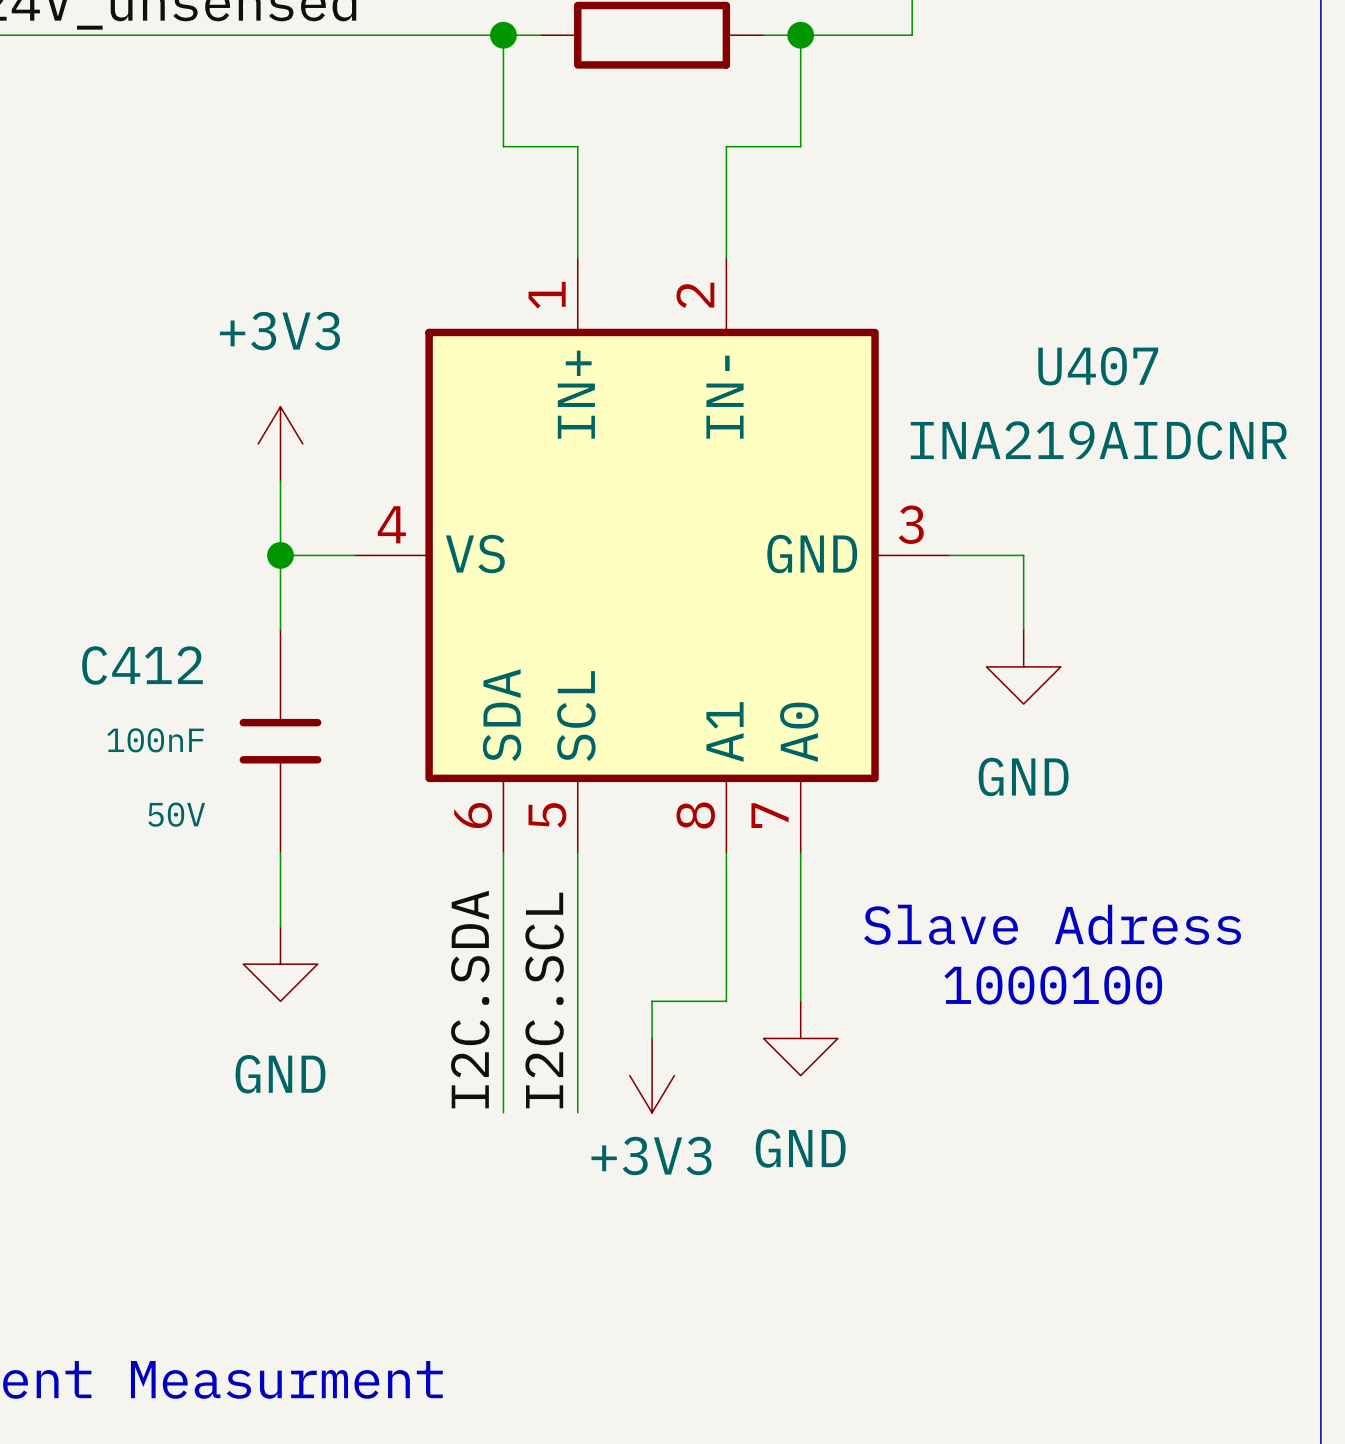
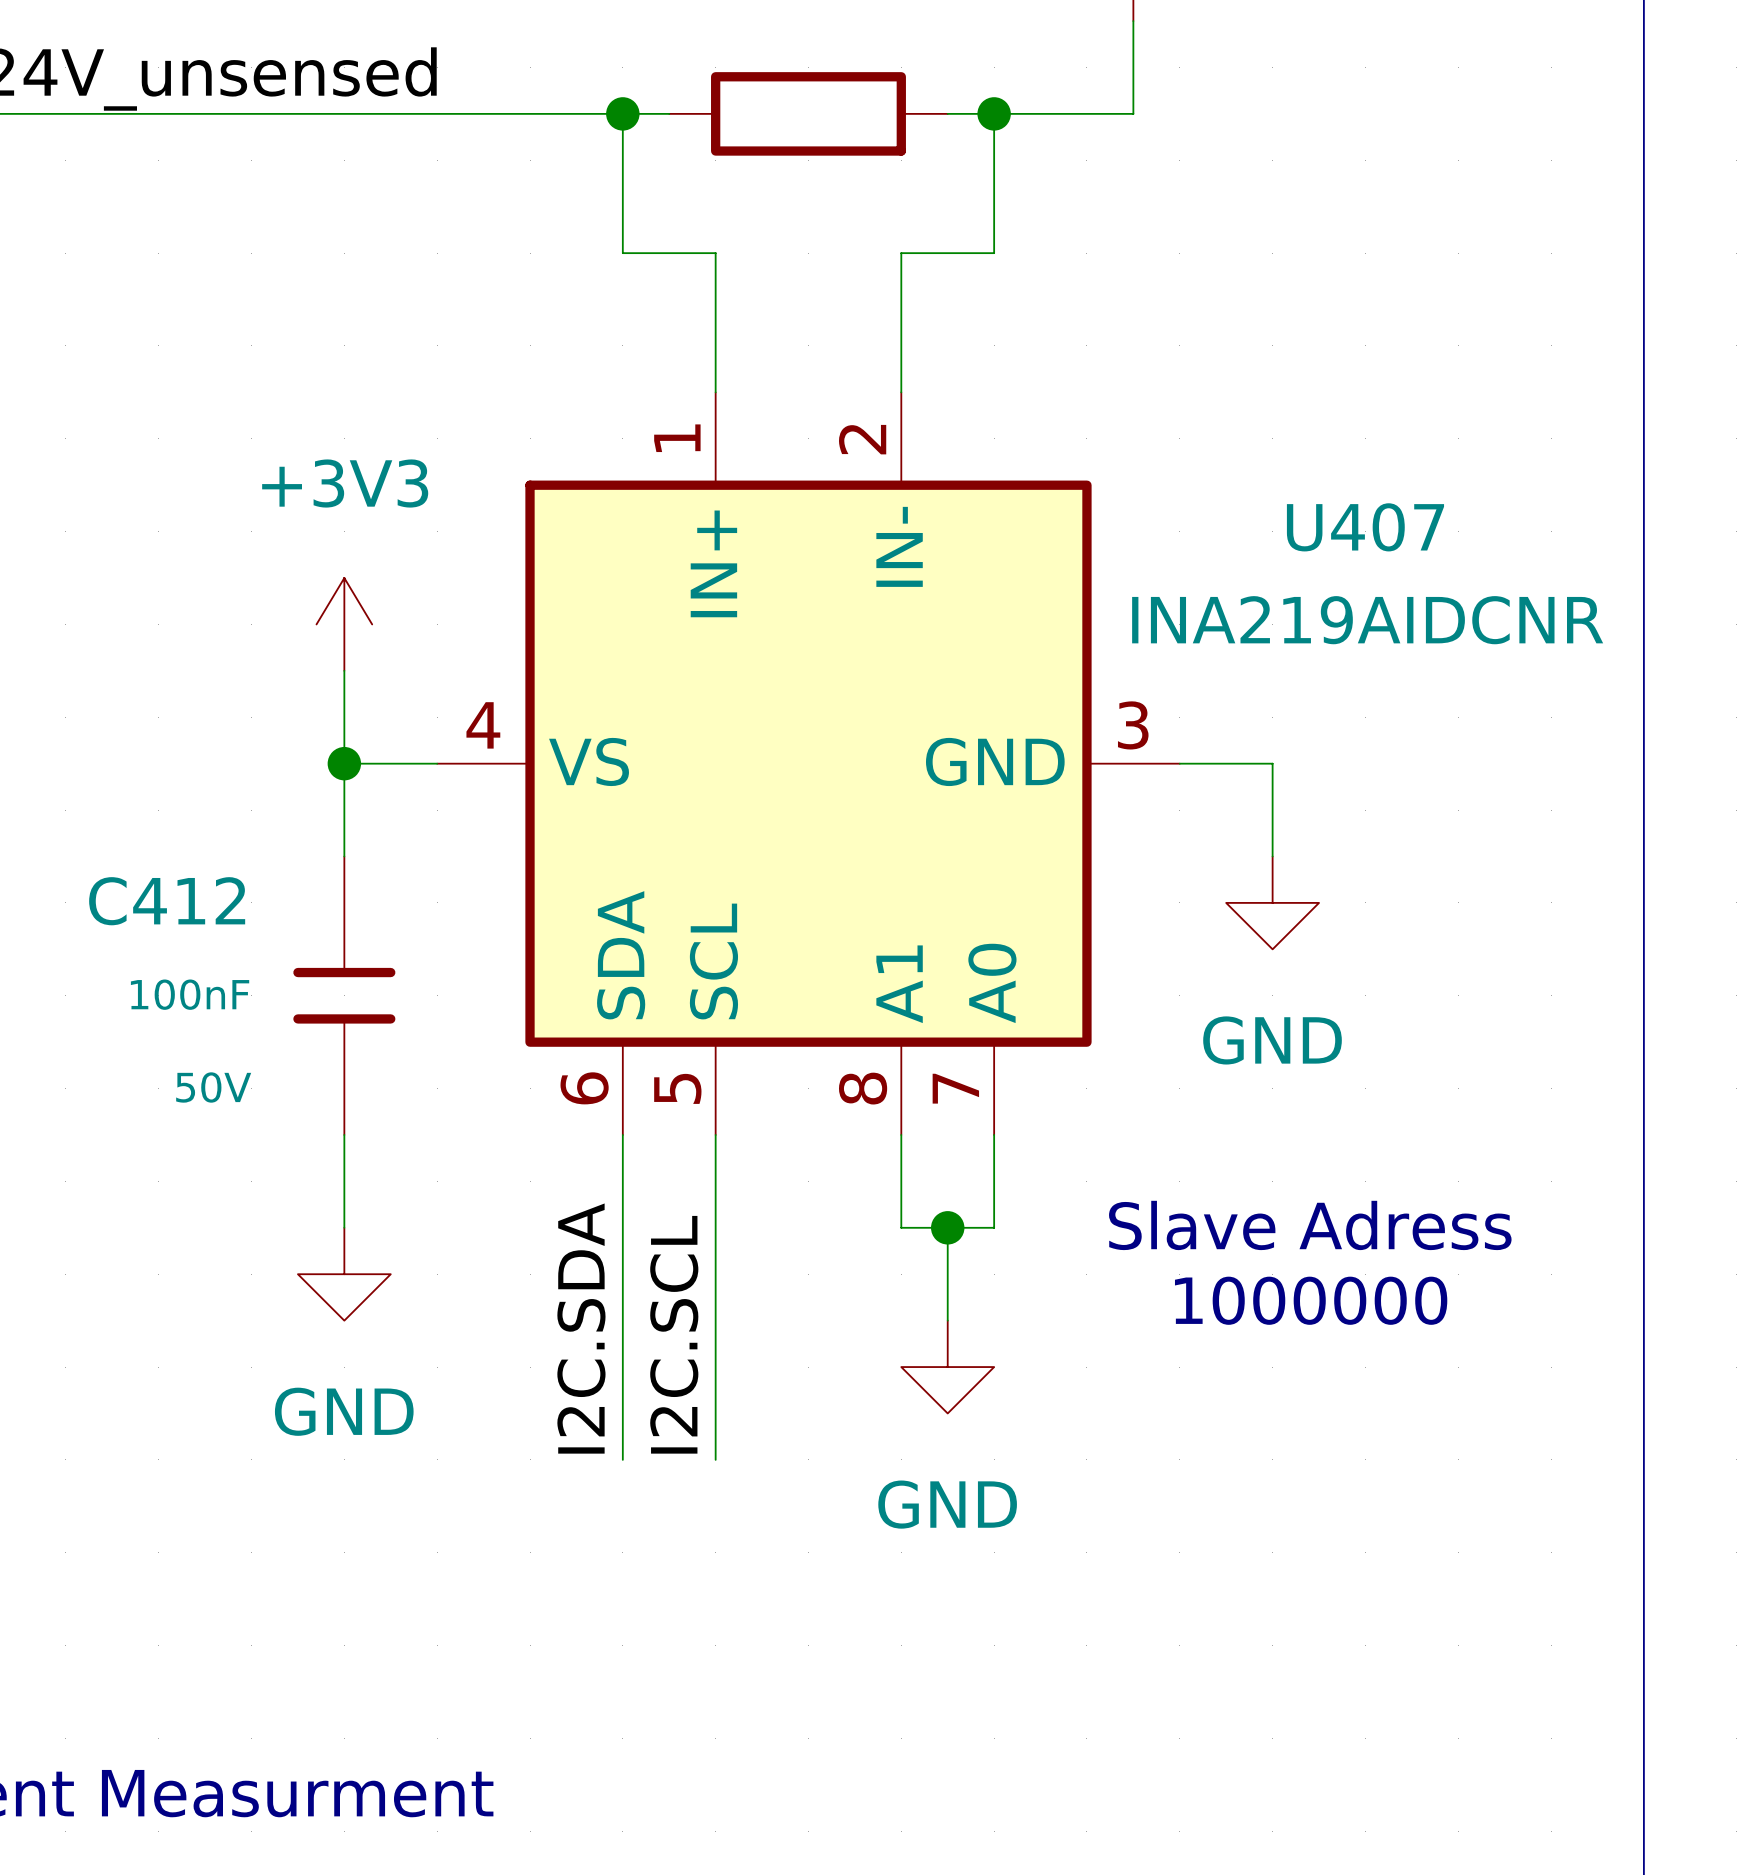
wire: (726, 926) (726, 1001) (652, 1001) (652, 1038) -> none
wire: none -> (947, 1227) (947, 1320)
junction: none -> (947, 1227)
wire: (800, 926) (800, 1001) -> (994, 1227) (901, 1227)
text: 1000100 (1053, 985) -> 1000000 (1311, 1300)
power symbol position: GND (800, 1038) -> GND (947, 1367)
power symbol: +3V3 (652, 1075) -> none

